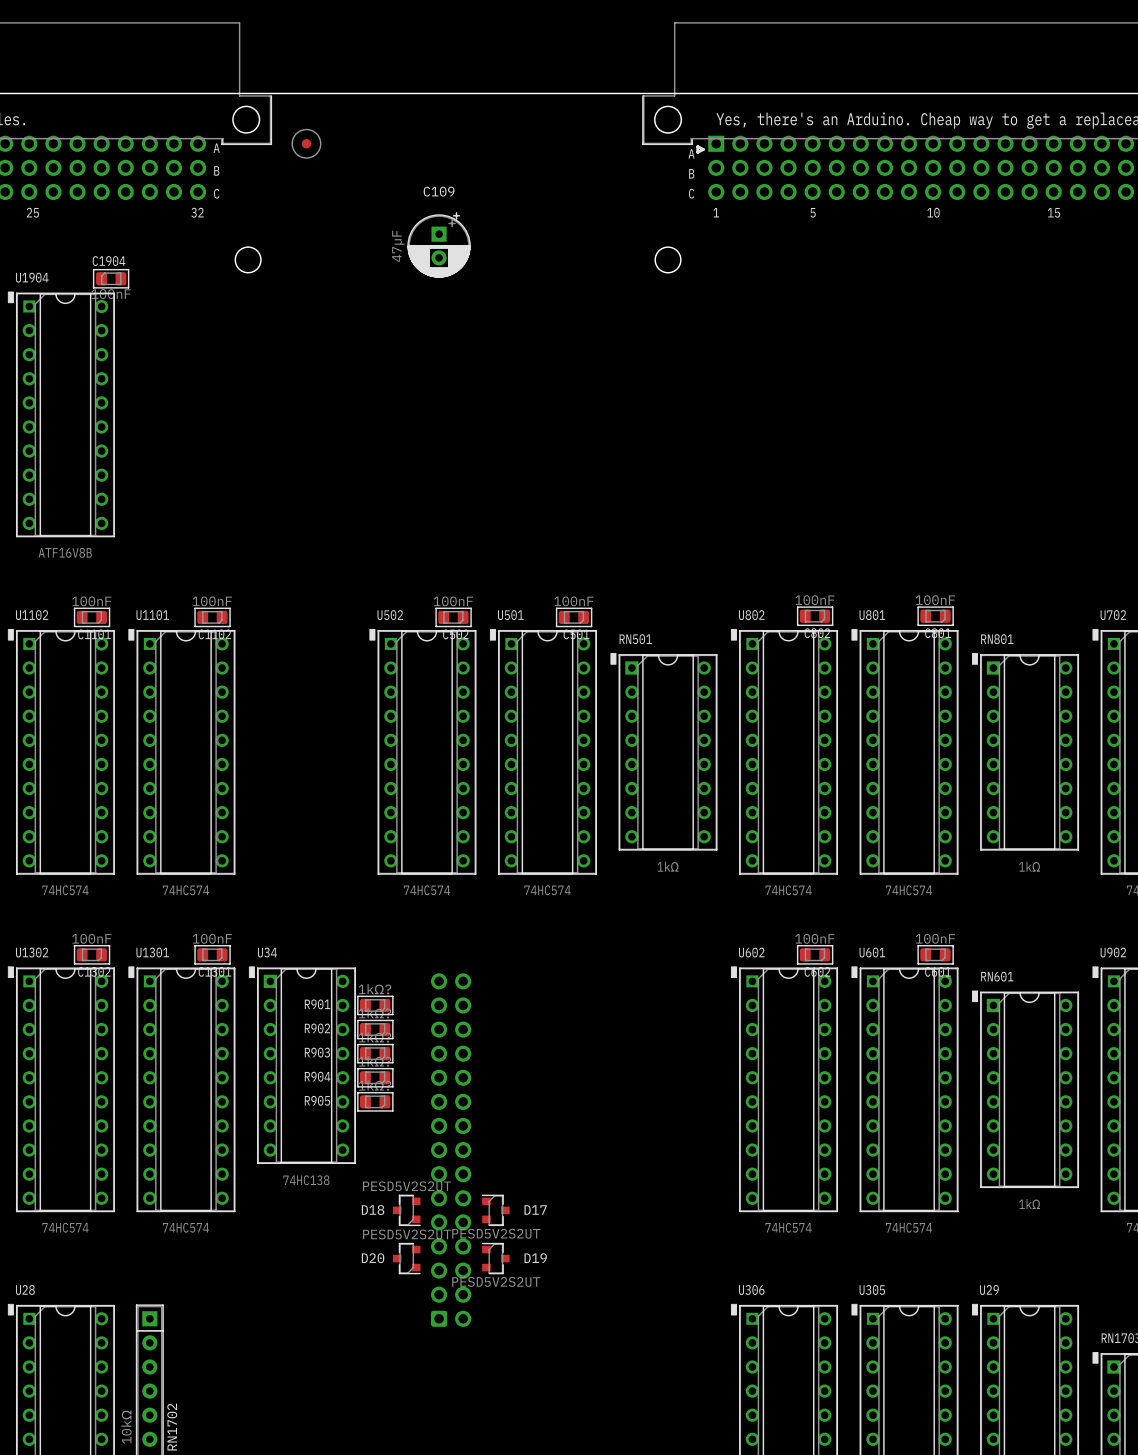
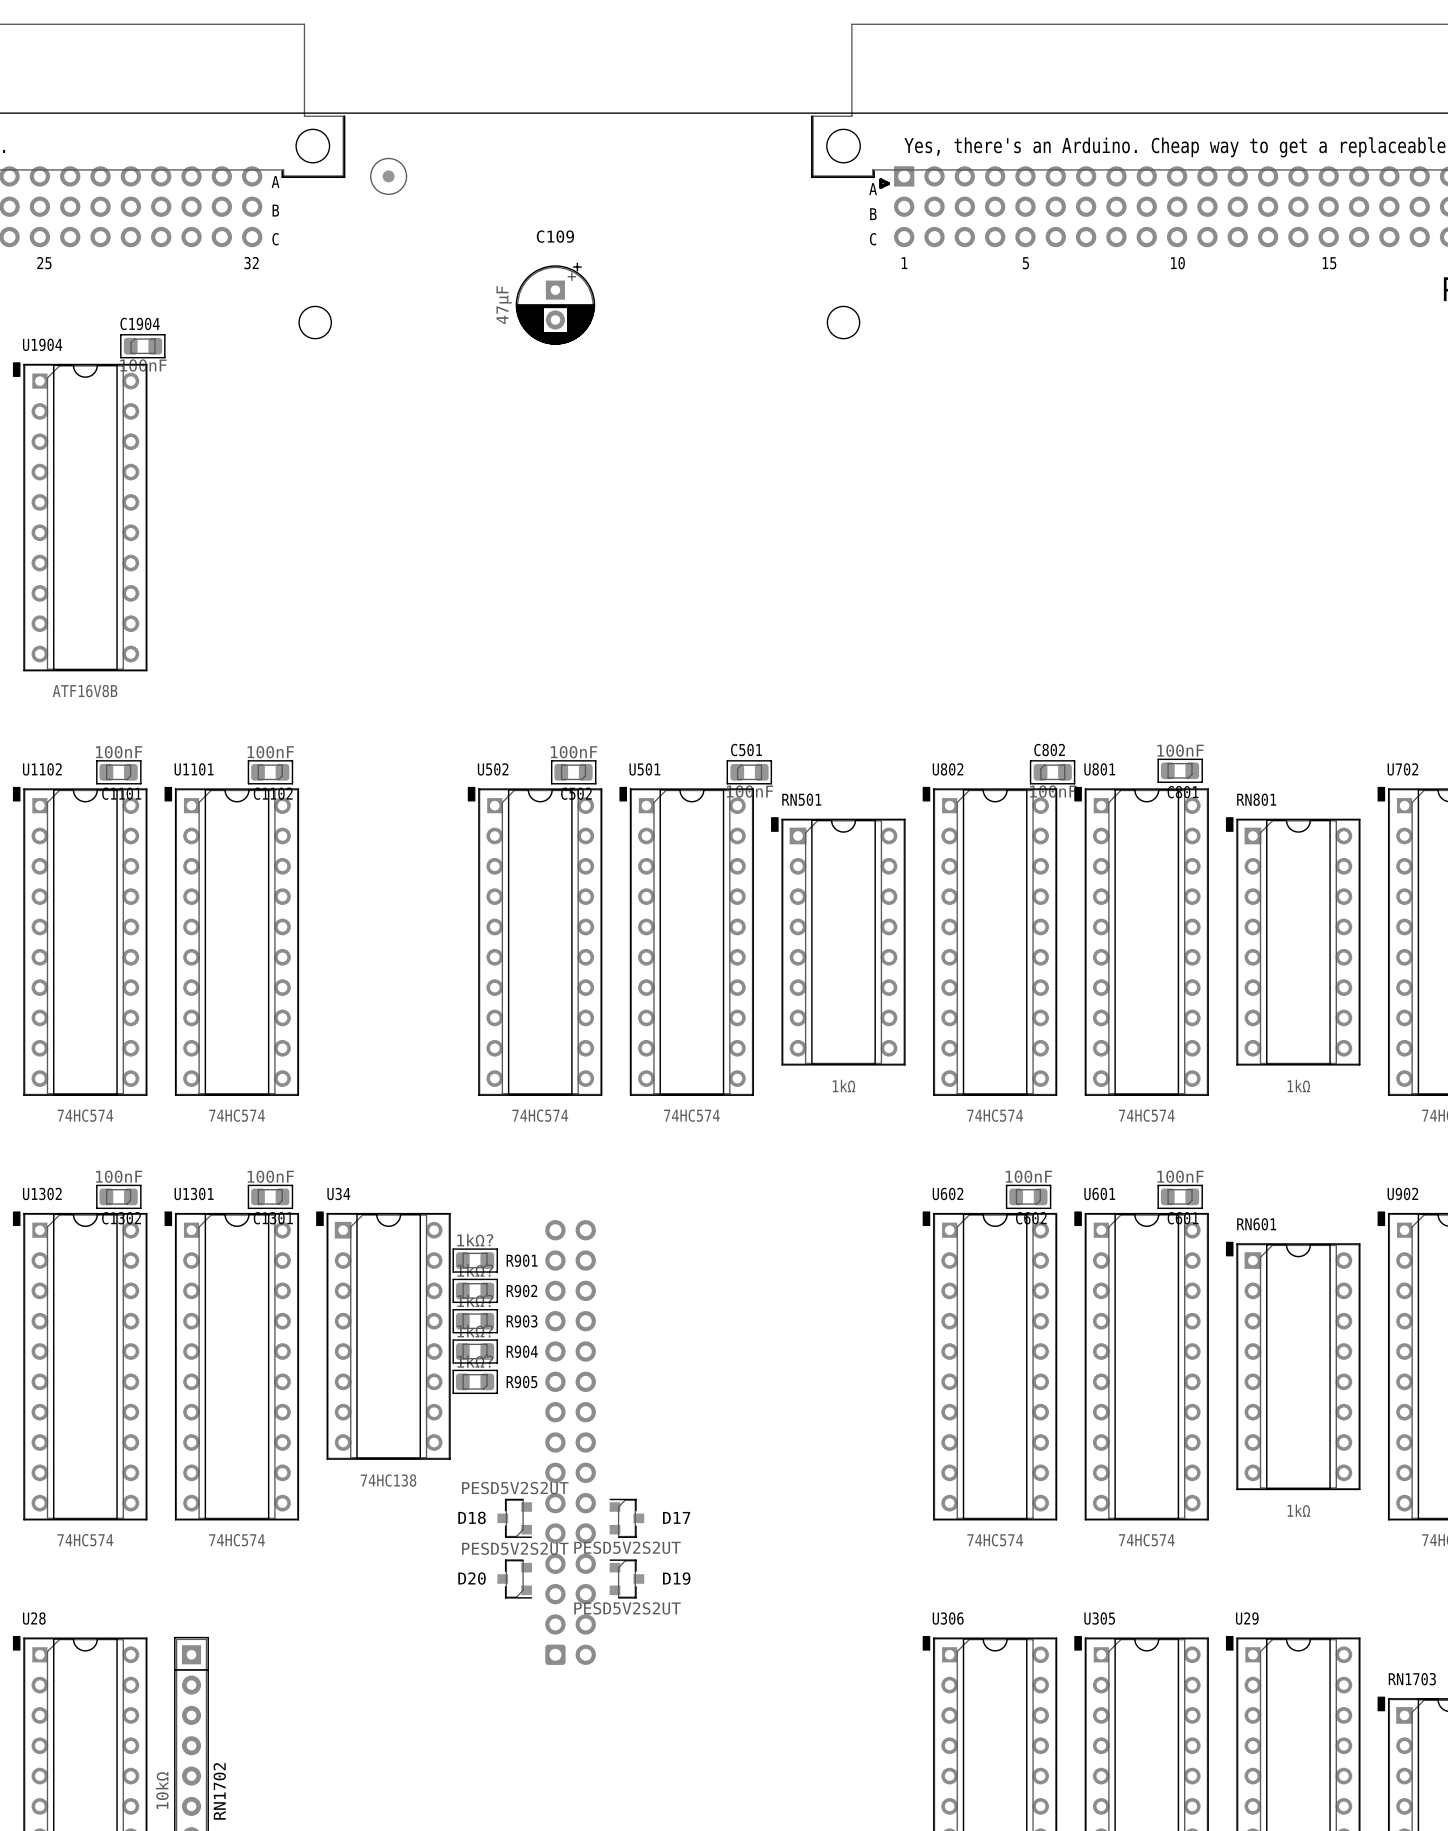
C802 rotation: 0° (815, 616) -> 180° (1052, 772)
C501 rotation: 0° (574, 617) -> 180° (749, 772)
R901 name position: R901 (317, 1004) -> R901 (522, 1260)
R902 name position: R902 (317, 1028) -> R902 (521, 1291)
R903 name position: R903 (317, 1052) -> R903 (522, 1321)
R904 name position: R904 (317, 1076) -> R904 (522, 1351)
R905 name position: R905 (317, 1100) -> R905 (522, 1382)

